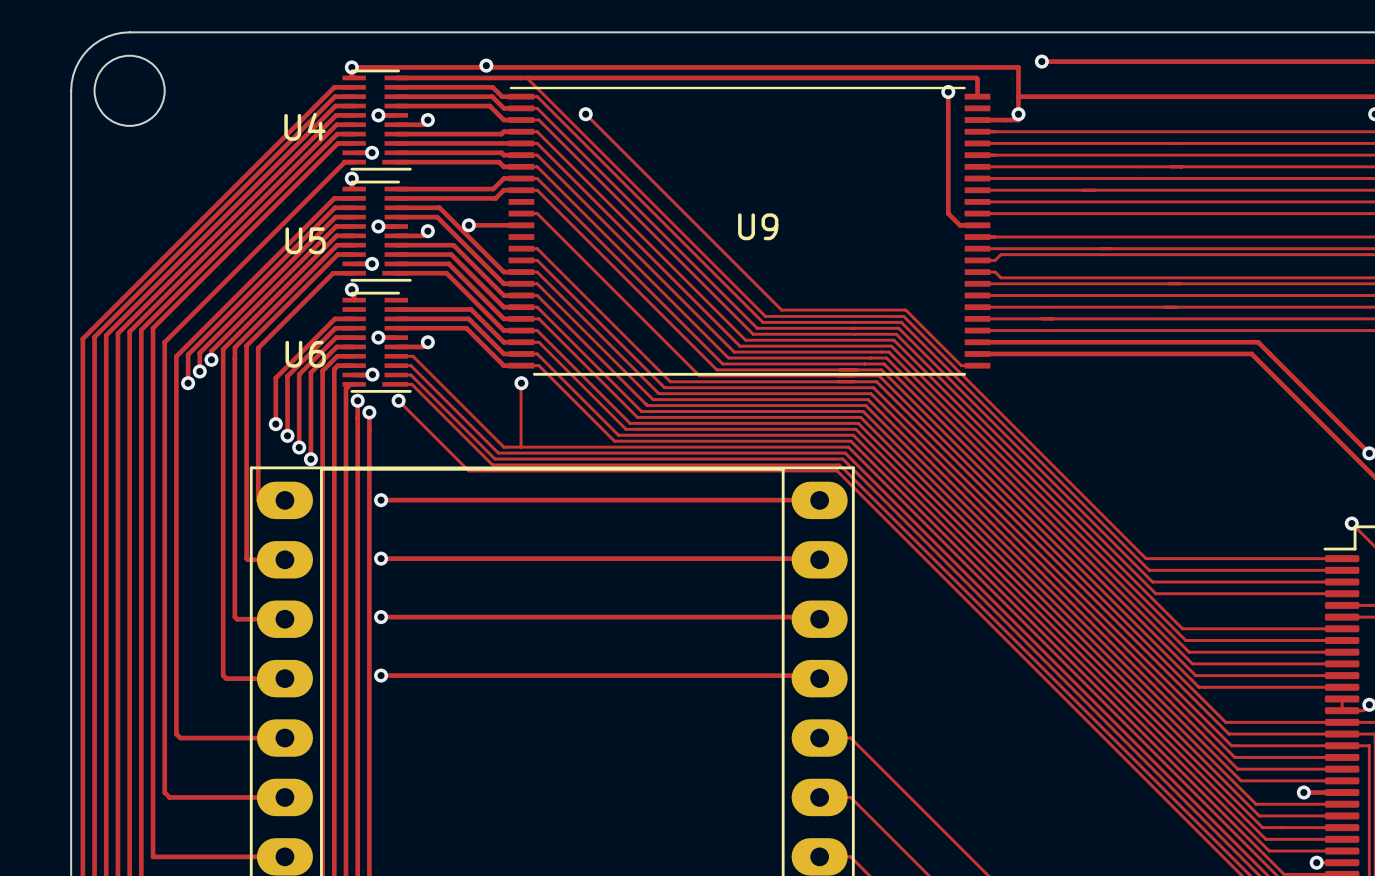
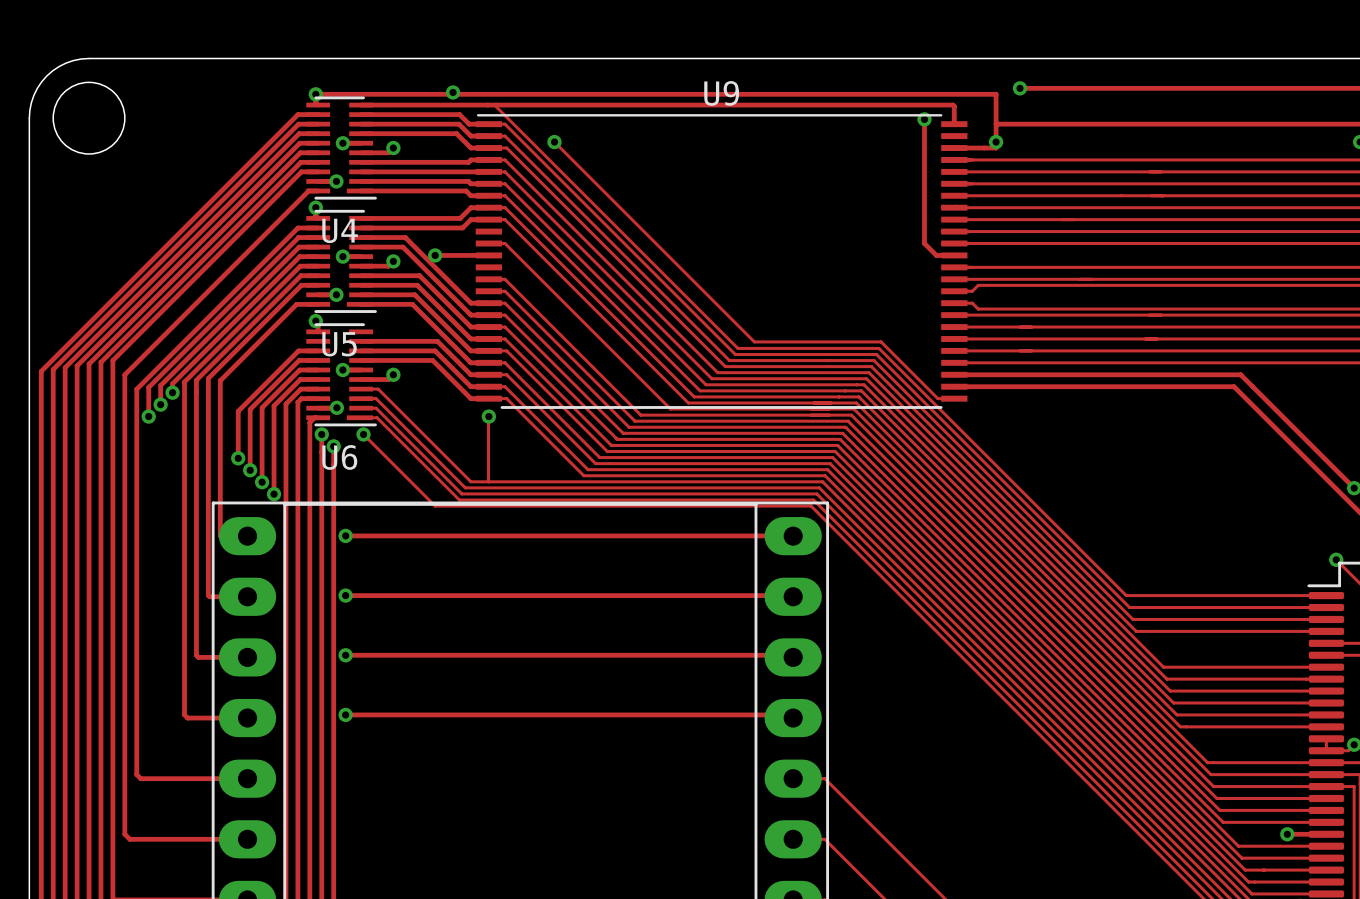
U4 name position: U4 (305, 126) -> U4 (340, 230)
U9 name position: U9 (758, 226) -> U9 (721, 93)
U5 name position: U5 (305, 240) -> U5 (339, 344)
U6 name position: U6 (305, 354) -> U6 (339, 457)

